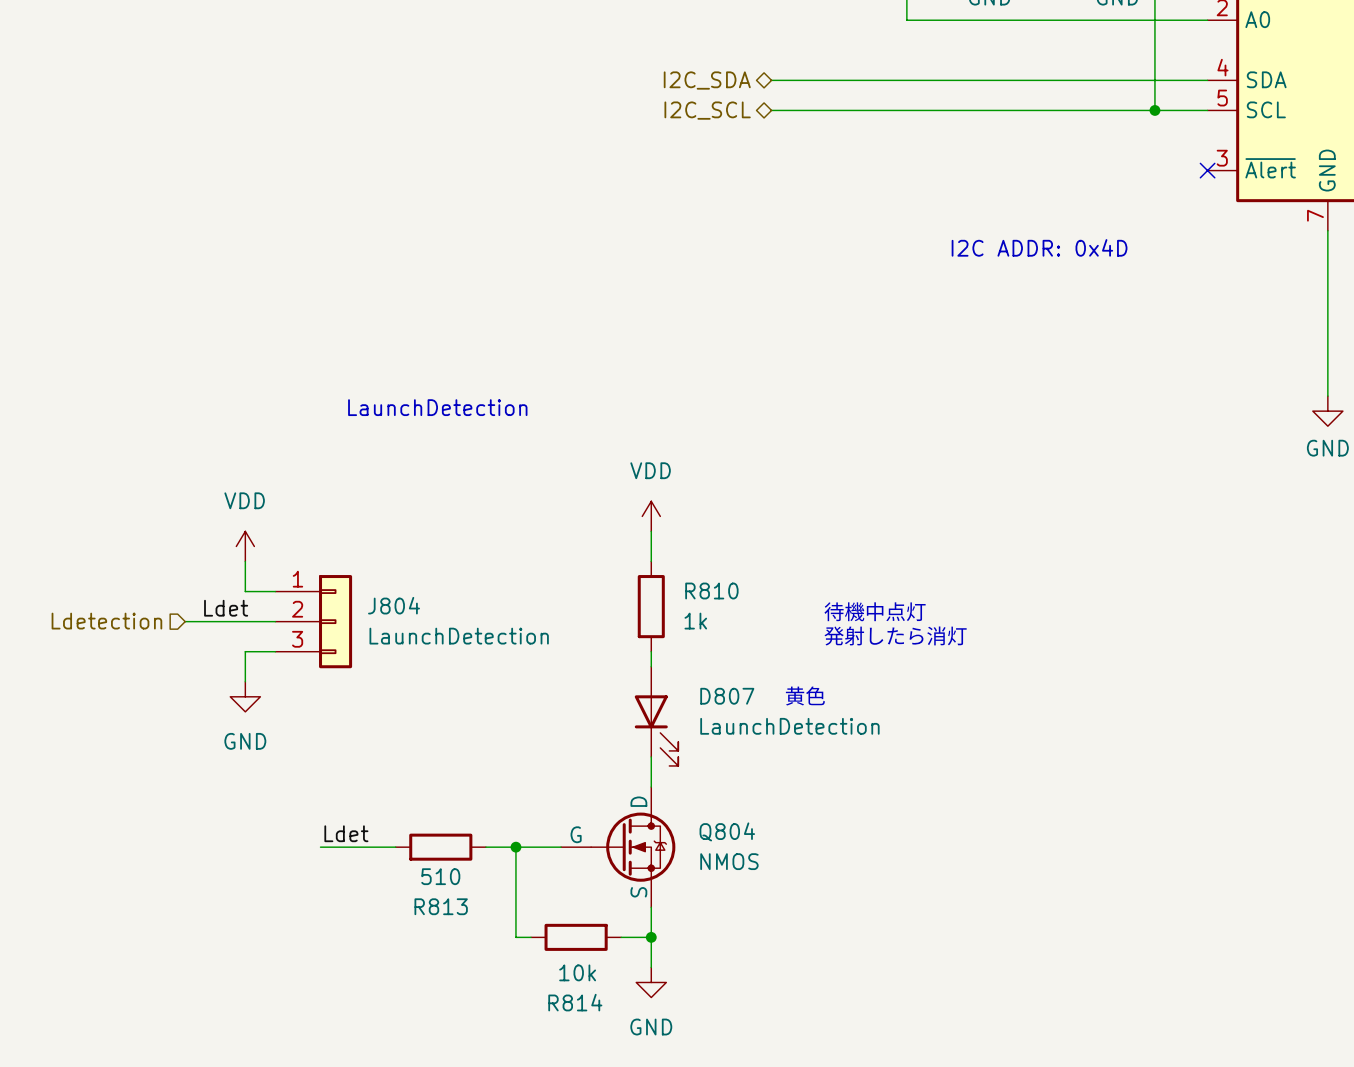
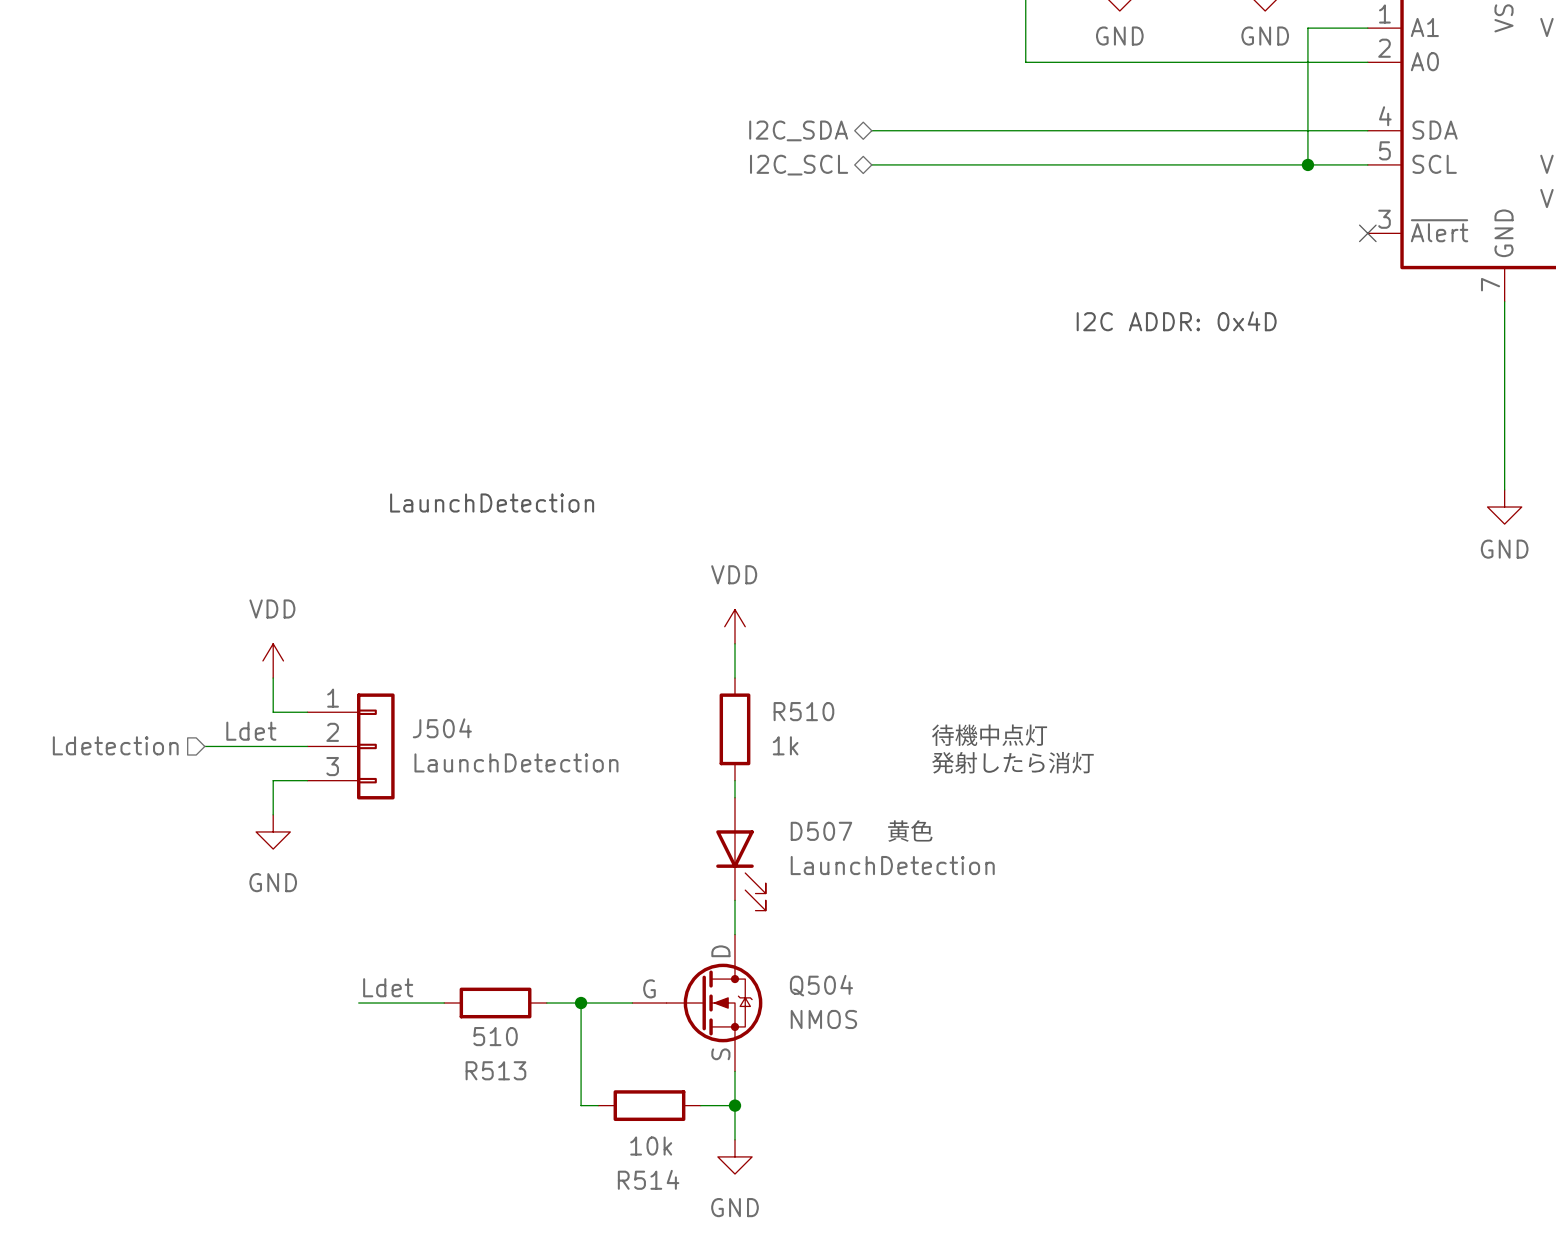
R810 name: R810 (711, 591) -> R510 (803, 711)
J804 name: J804 (394, 605) -> J504 (442, 728)
D807 name: D807 (727, 696) -> D507 (821, 831)
Q804 name: Q804 (727, 831) -> Q504 (821, 985)
R813 name: R813 (441, 906) -> R513 (495, 1070)
R814 name: R814 (575, 1002) -> R514 (648, 1179)

